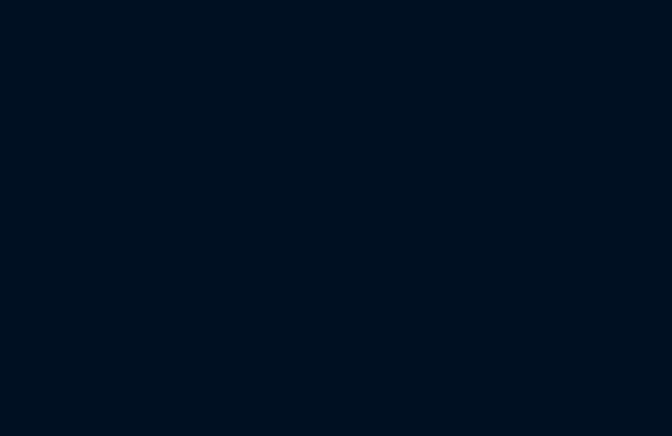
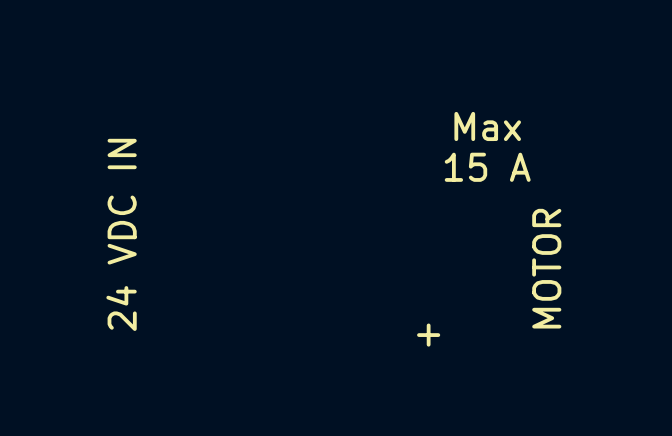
text: none -> Max (487, 126)
text: none -> 15 A (487, 167)
text: none -> 24 VDC IN (121, 234)
text: none -> MOTOR (546, 268)
text: none -> + (428, 335)

